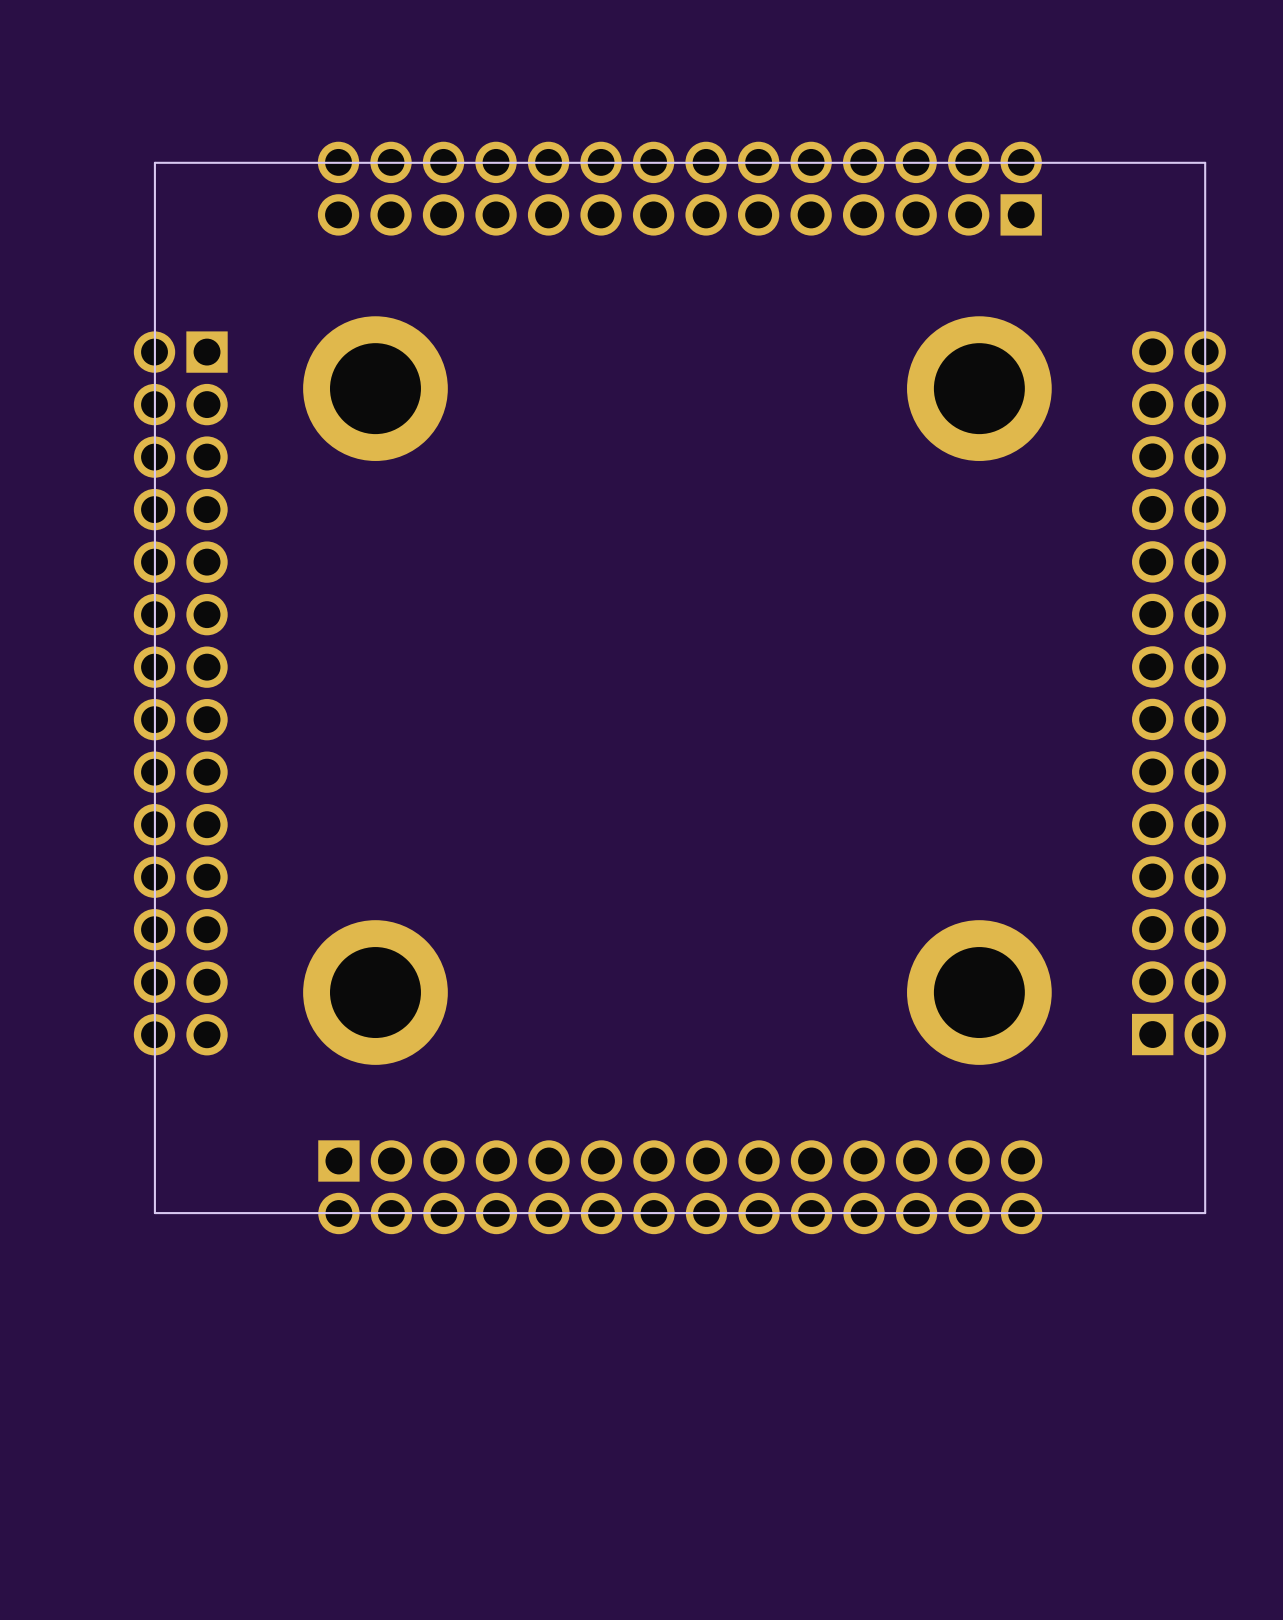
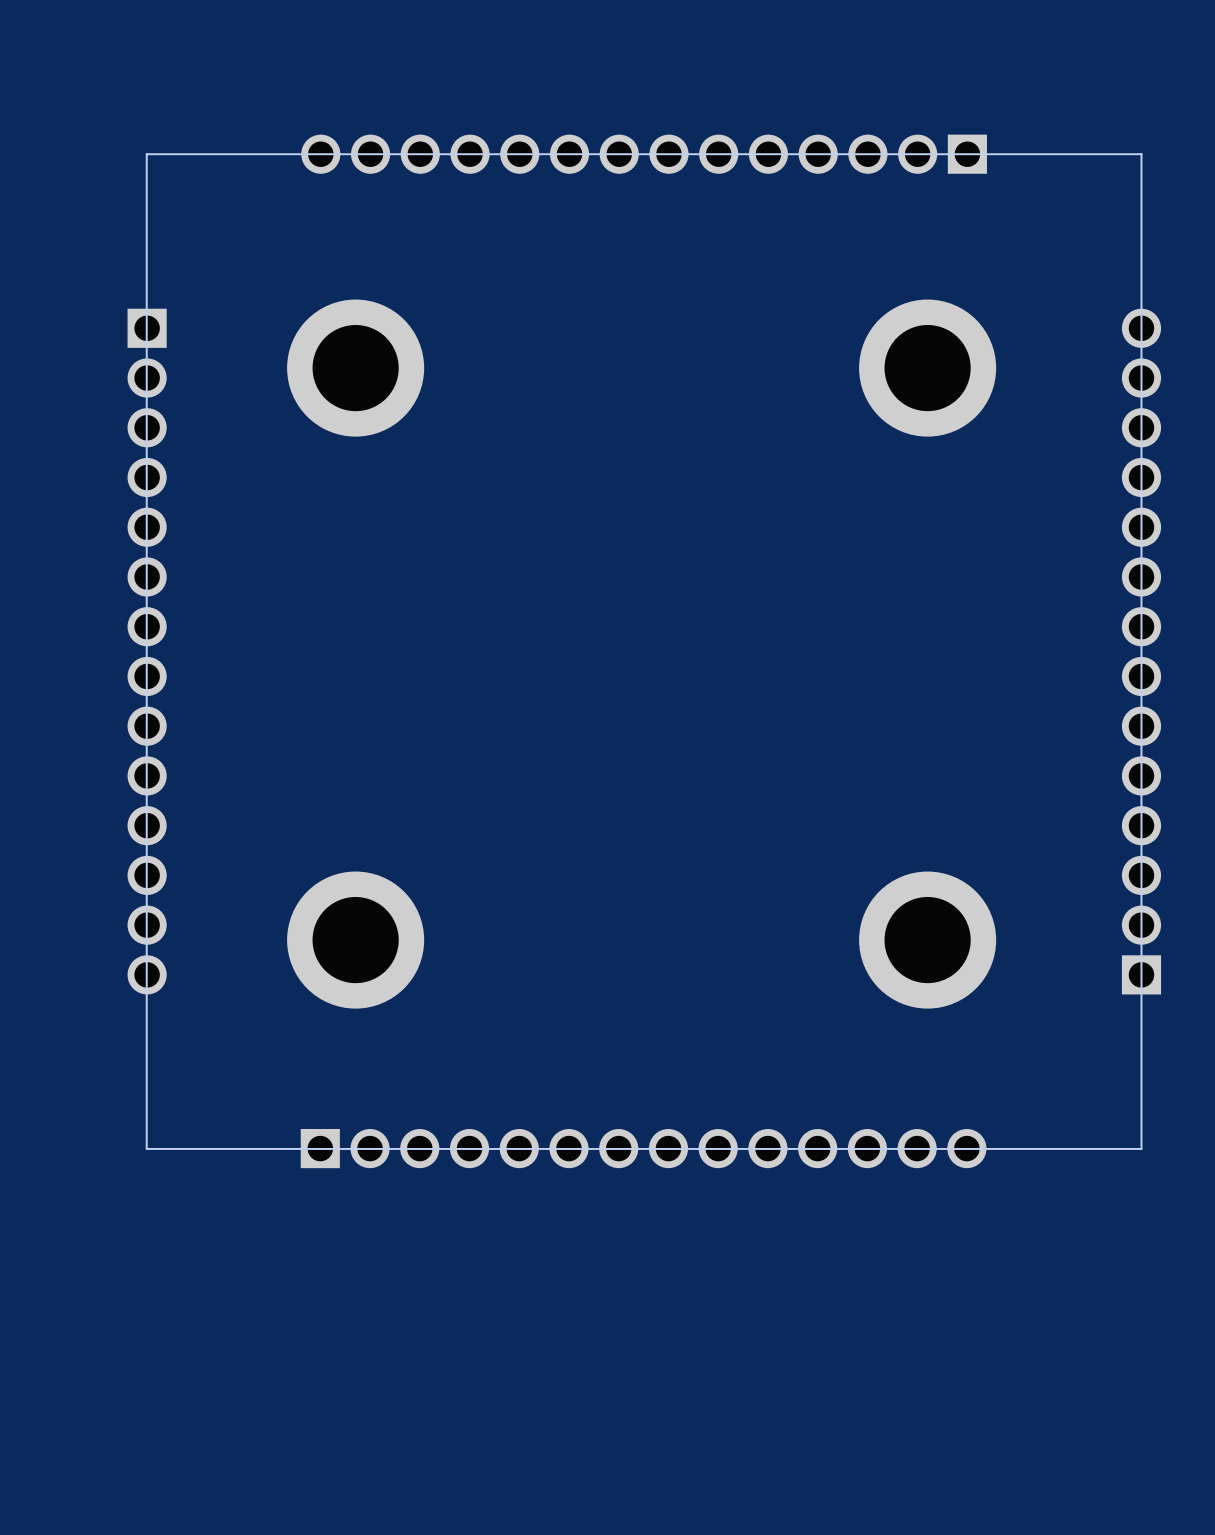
part footprint: [317, 141, 1042, 236] -> [301, 134, 987, 174]
part footprint: [133, 331, 228, 1056] -> [127, 308, 167, 995]
part footprint: [1132, 331, 1226, 1056] -> [1121, 308, 1162, 995]
part footprint: [318, 1140, 1043, 1235] -> [300, 1128, 987, 1169]

